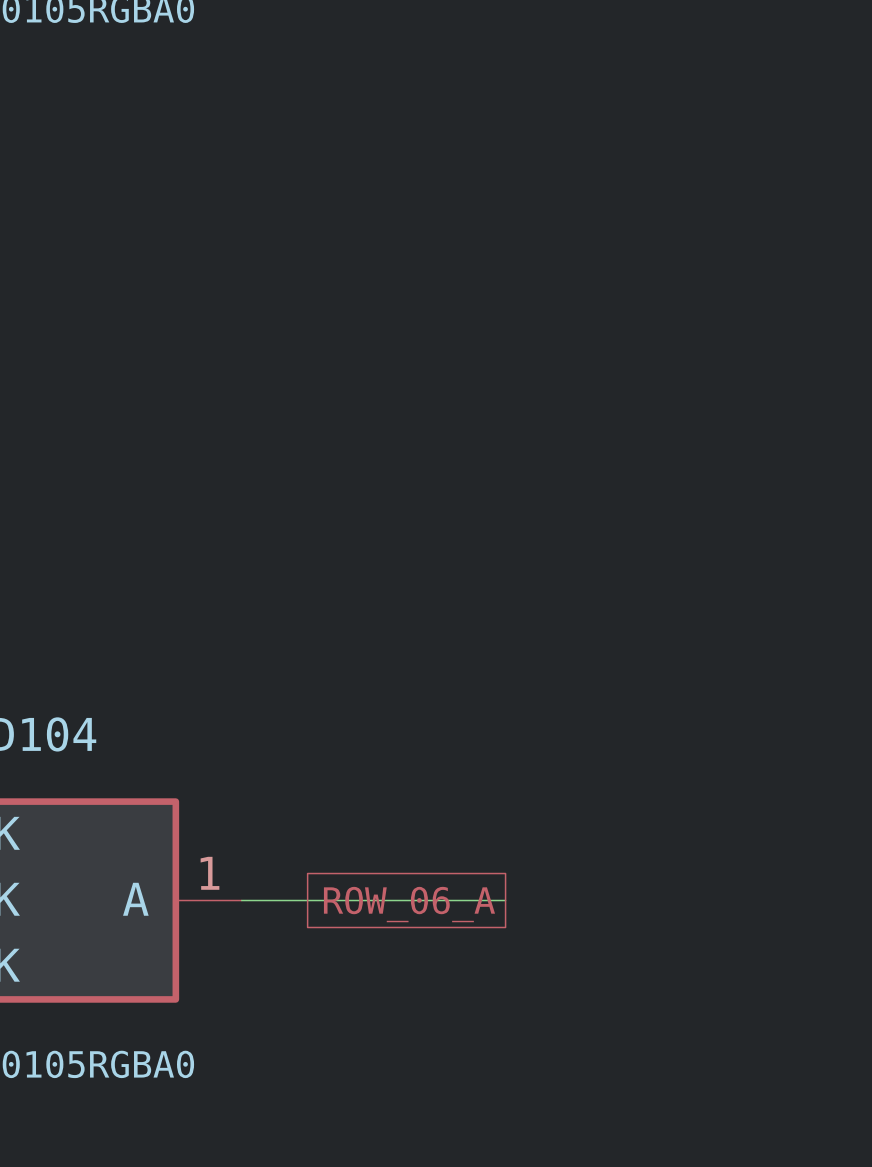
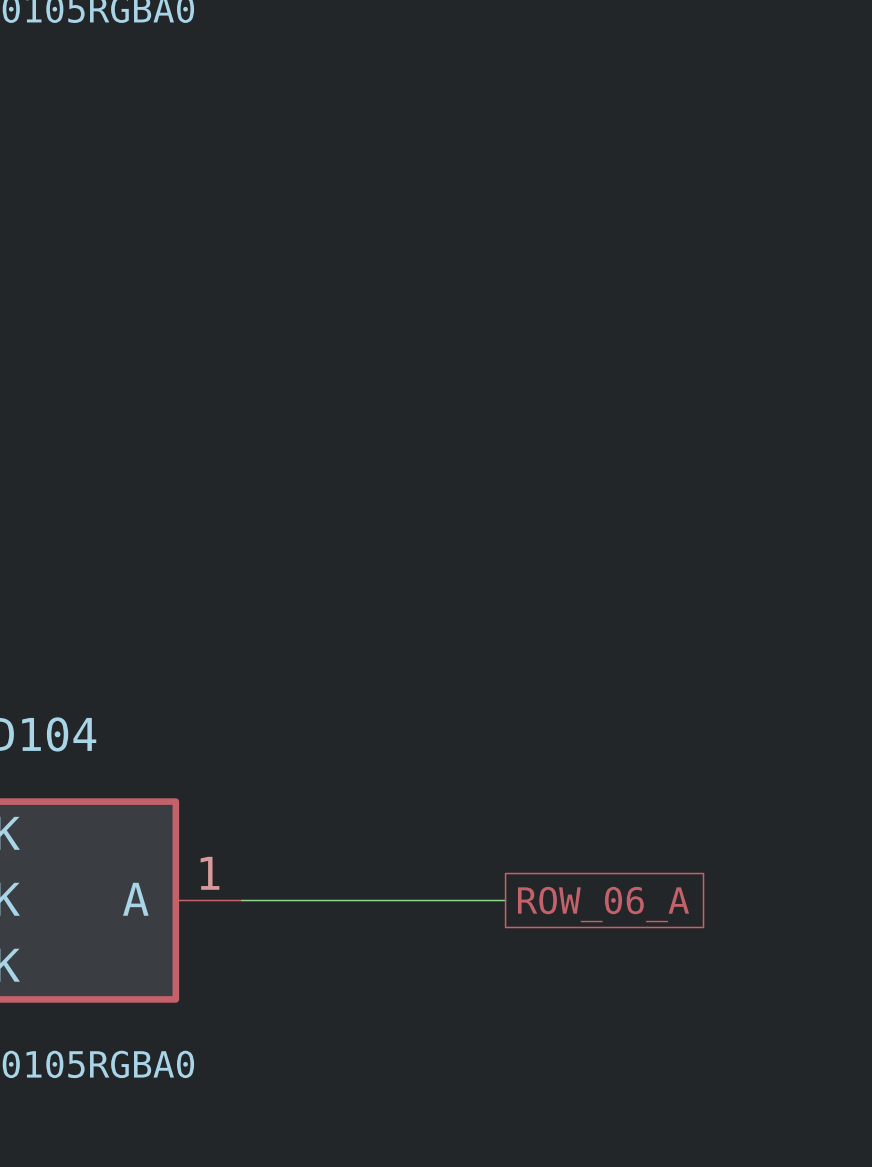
global label rotation: 0° (409, 904) -> 180° (603, 904)

